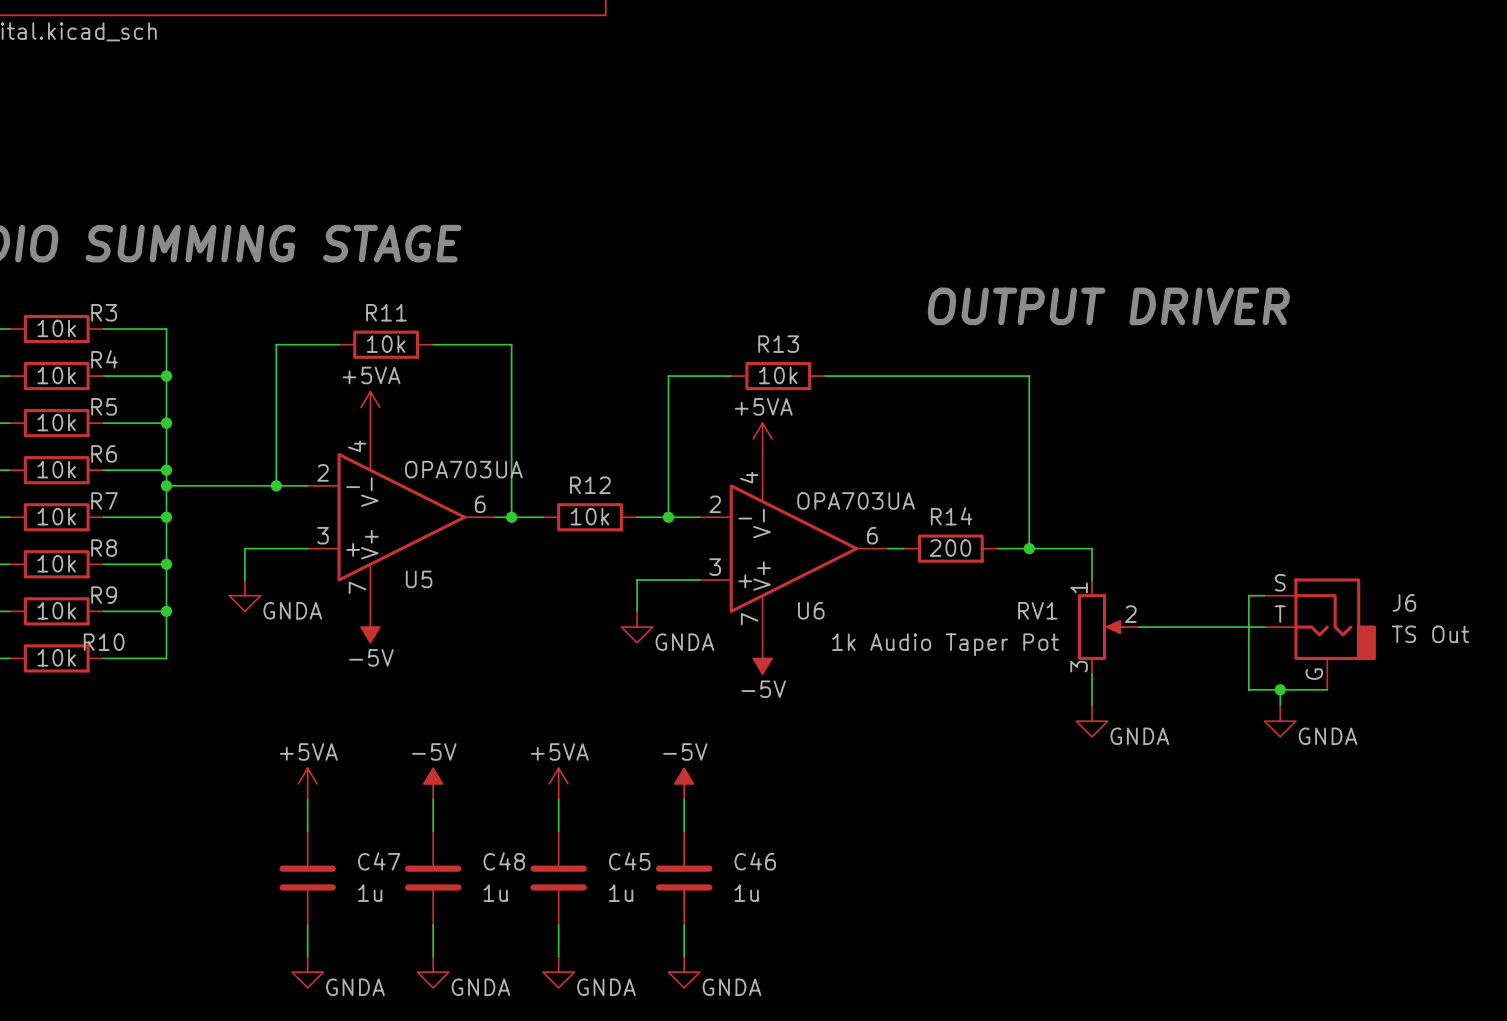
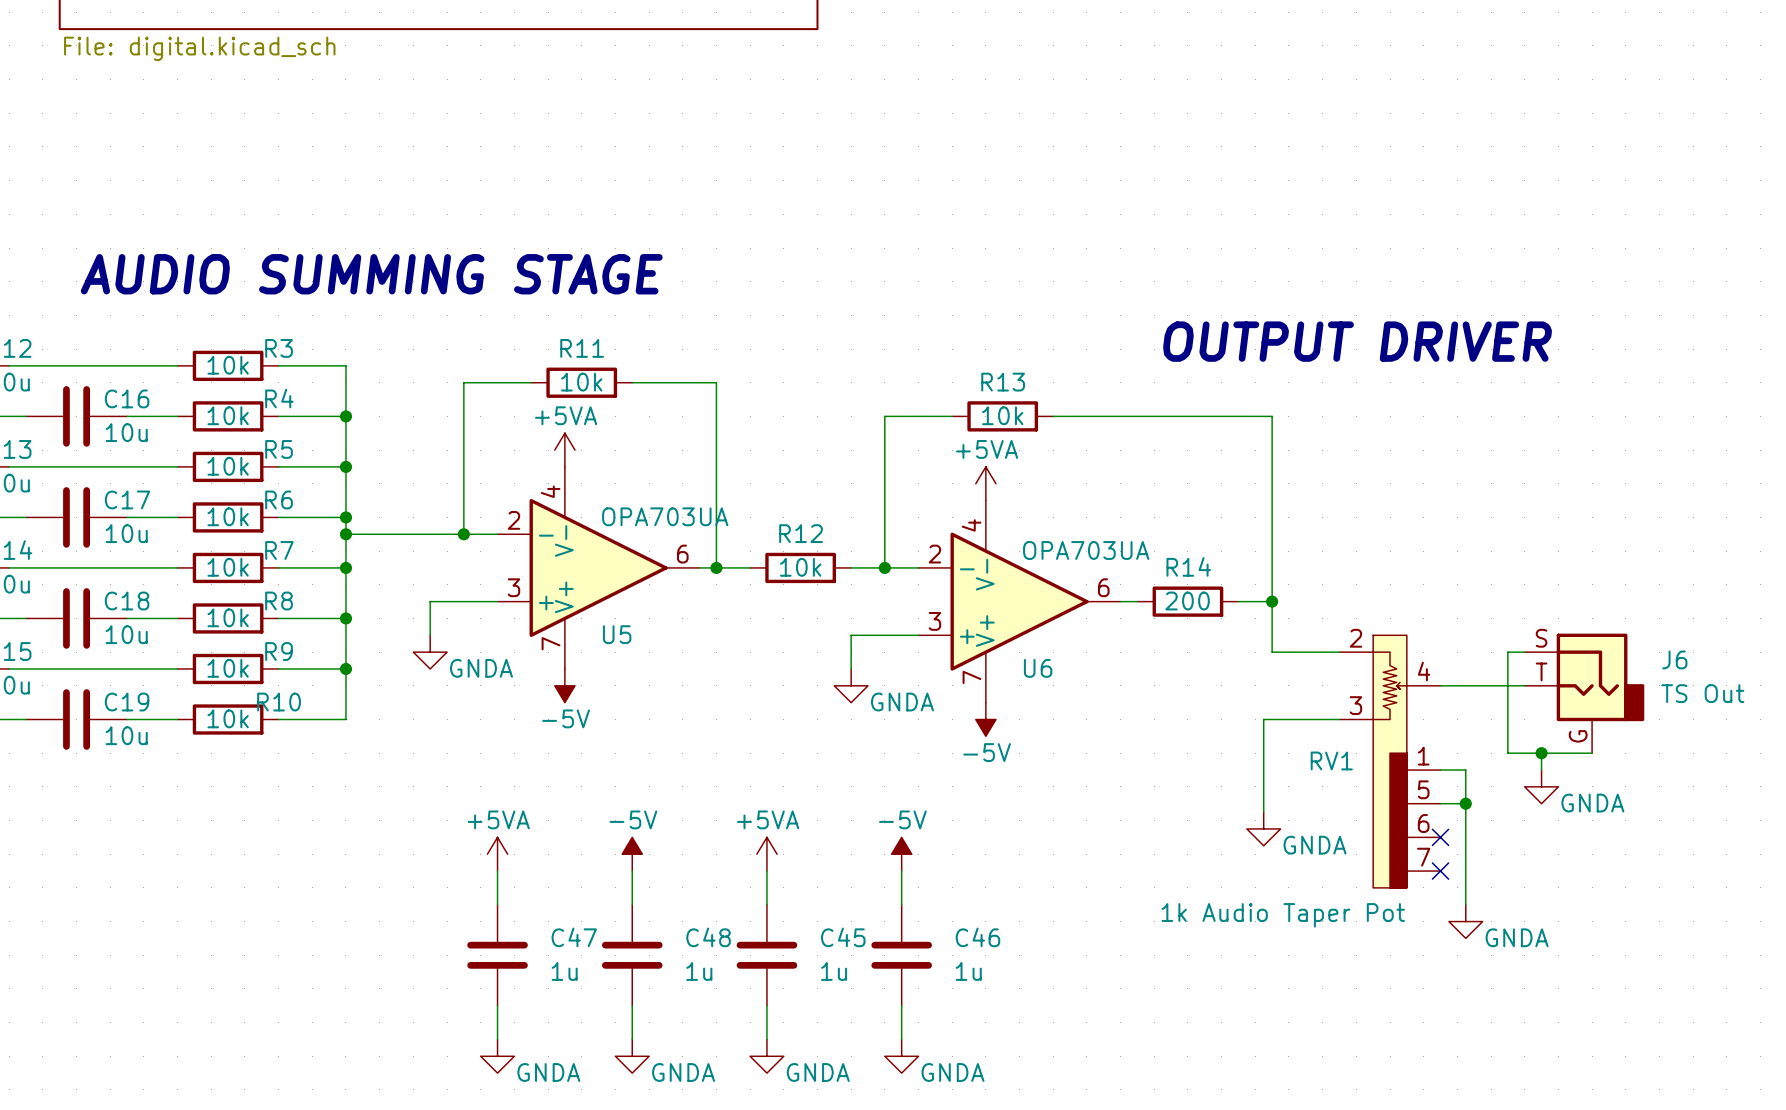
wire: (1029, 548) (1092, 548) (1092, 580) -> (1272, 601) (1272, 652) (1339, 652)
RV1 symbol: [1077, 580, 1140, 675] -> [1339, 635, 1441, 888]
RV1 value position: 1k Audio Taper Pot (945, 644) -> 1k Audio Taper Pot (1283, 915)
wire: none -> (1339, 719) (1263, 719) (1263, 812)
wire: (1092, 674) (1092, 705) -> none
wire: none -> (1440, 770) (1465, 770) (1465, 904)
power symbol position: GNDA (1092, 721) -> GNDA (1263, 828)
wire: none -> (1440, 803) (1465, 803)
junction: none -> (1465, 803)
no-connect mark: none -> (1440, 837)
no-connect mark: none -> (1440, 871)
power symbol: none -> GNDA (1465, 921)

